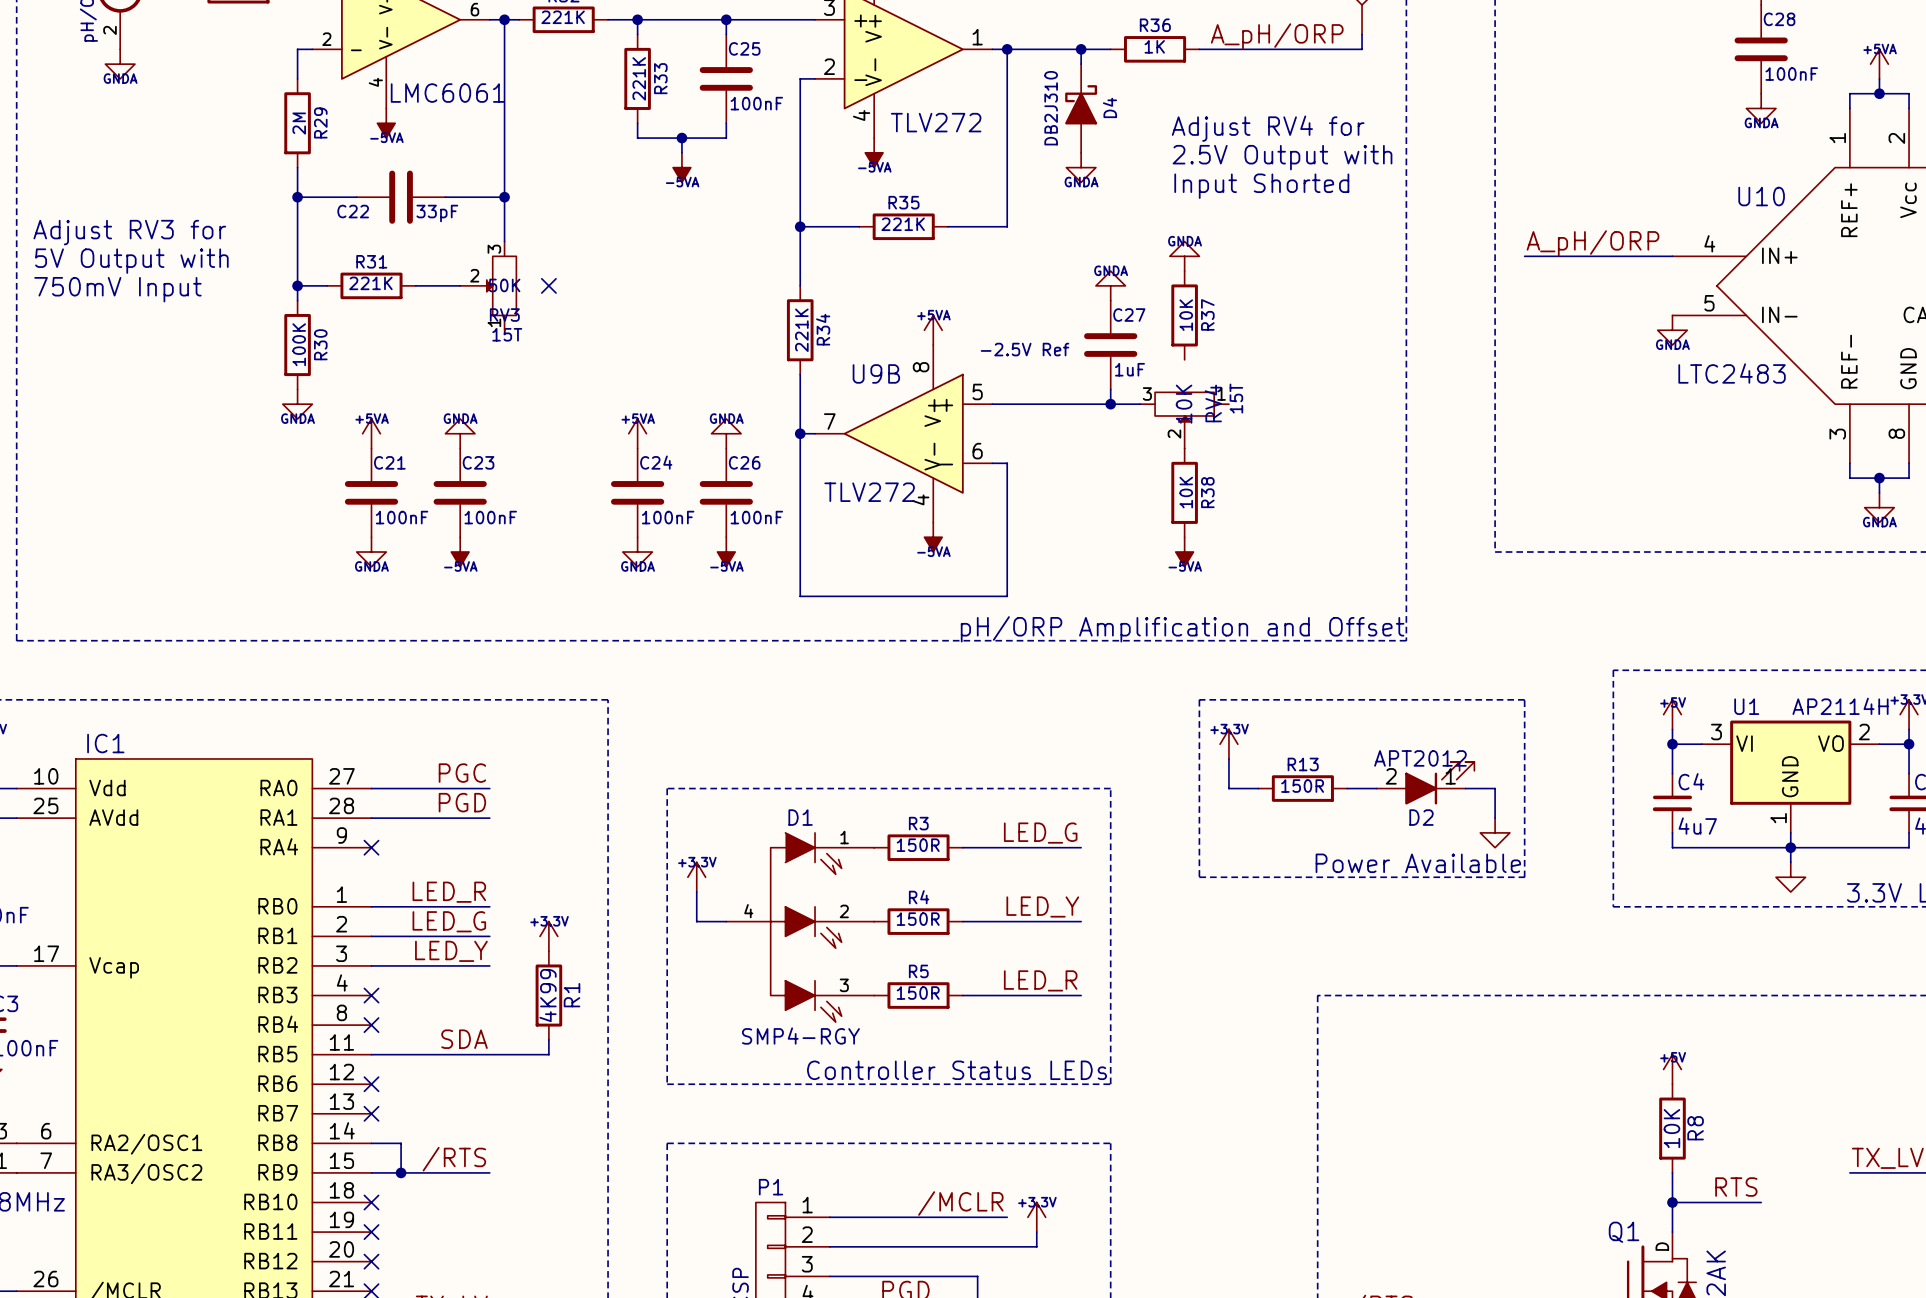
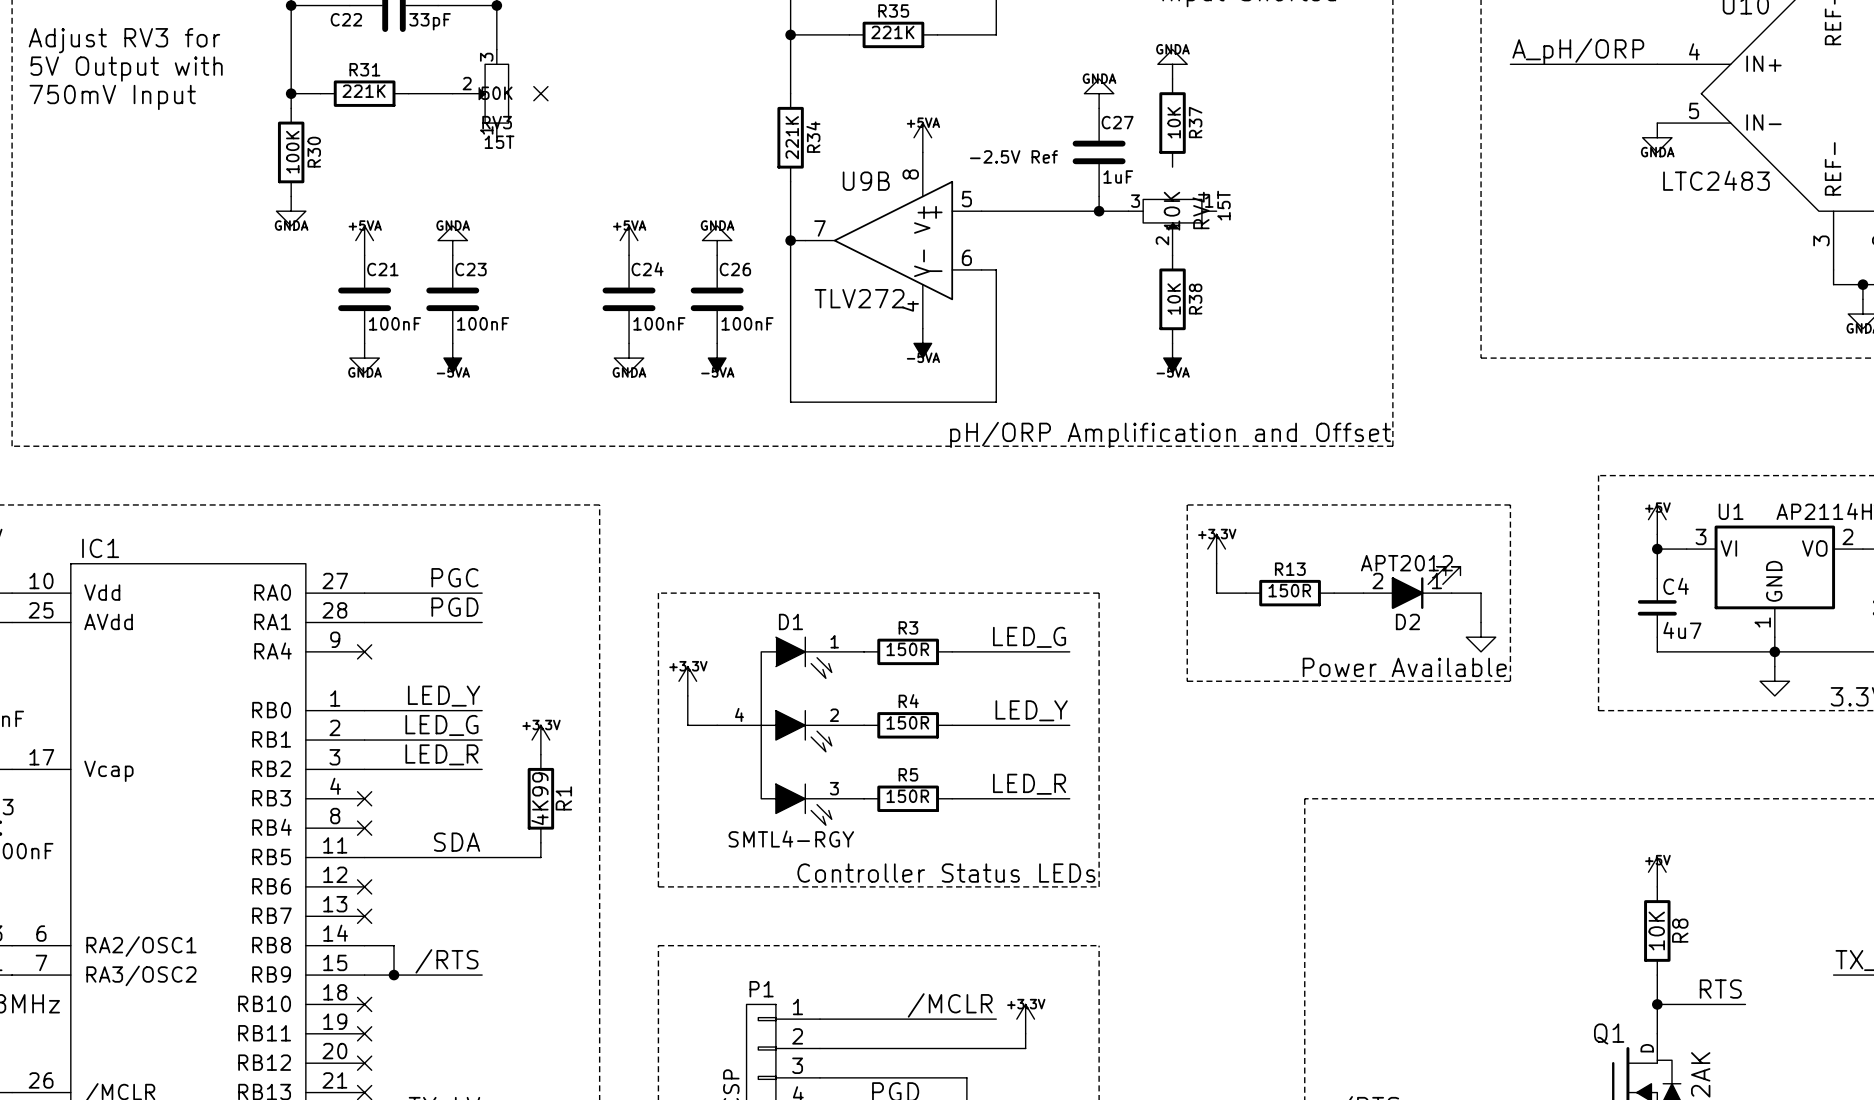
label: LED_R (449, 892) -> LED_Y (444, 696)
label: LED_Y (451, 951) -> LED_R (441, 754)
D1 value: SMP4-RGY (800, 1036) -> SMTL4-RGY (791, 839)

